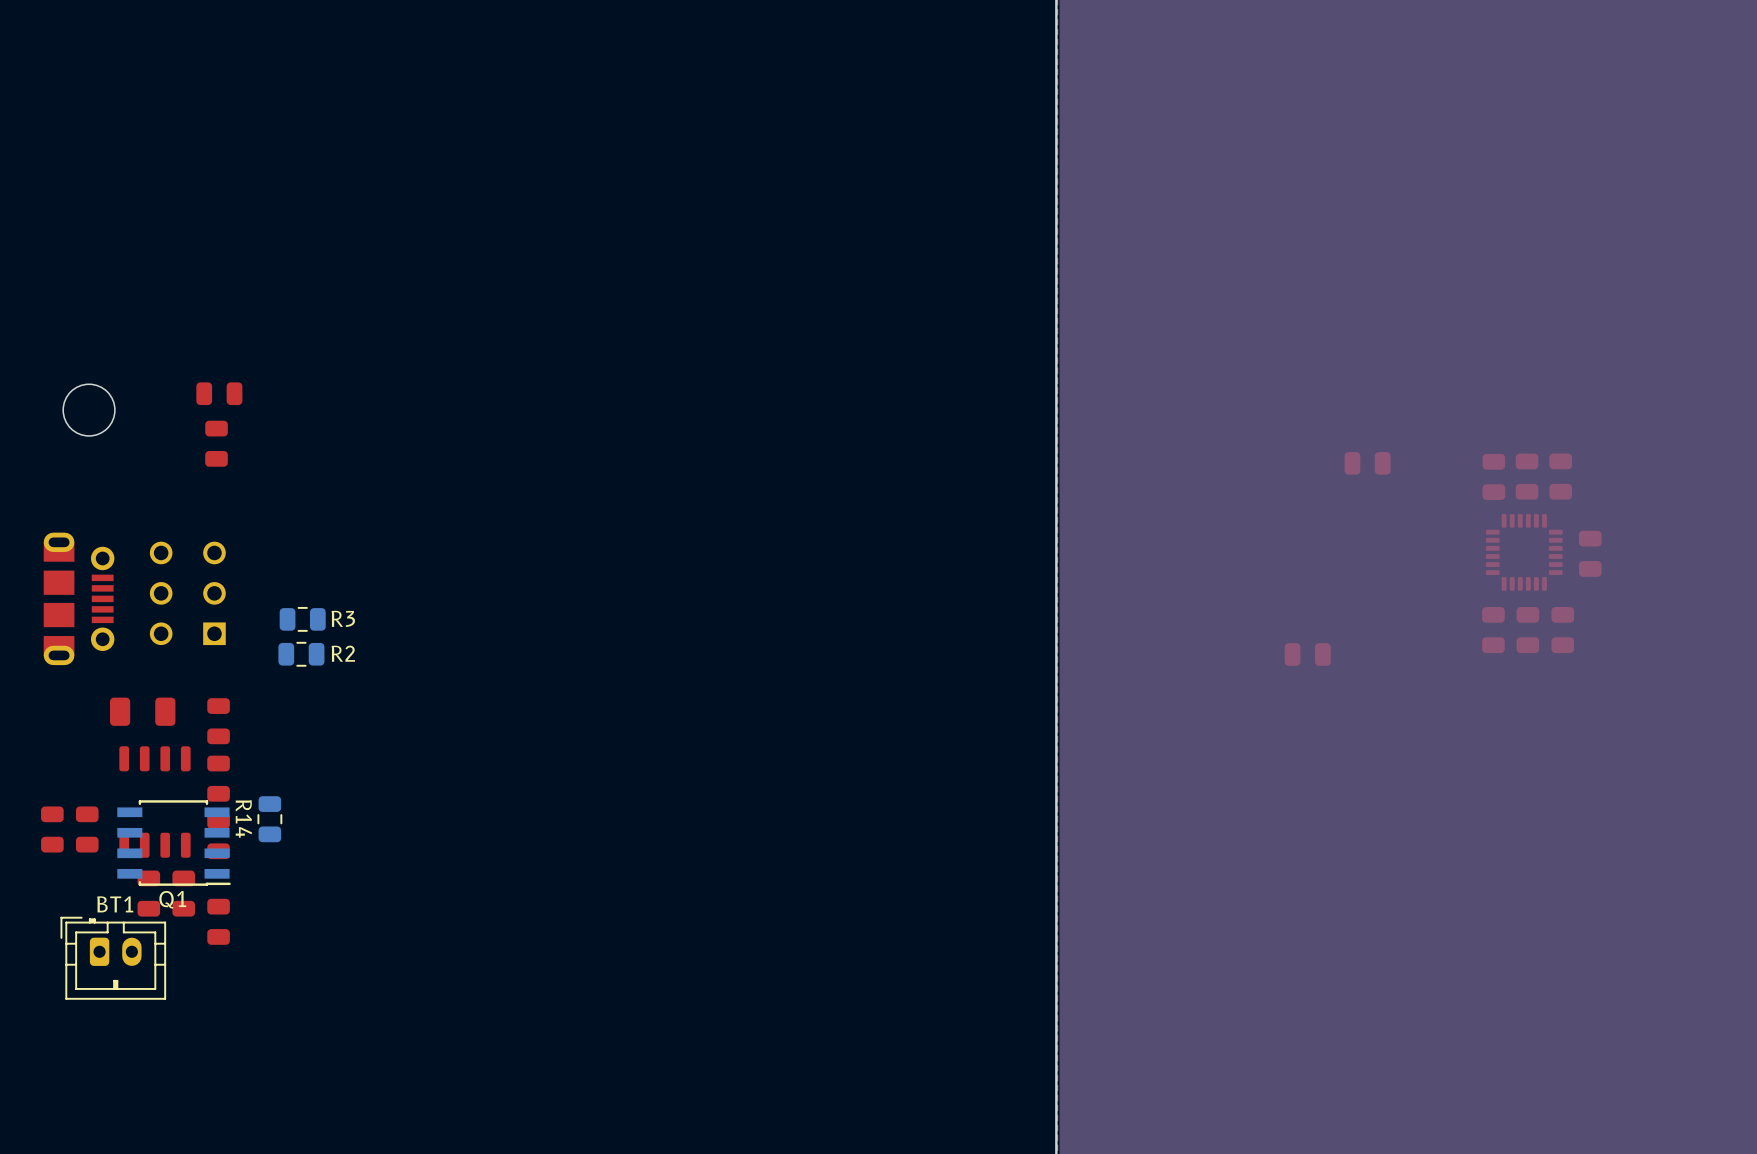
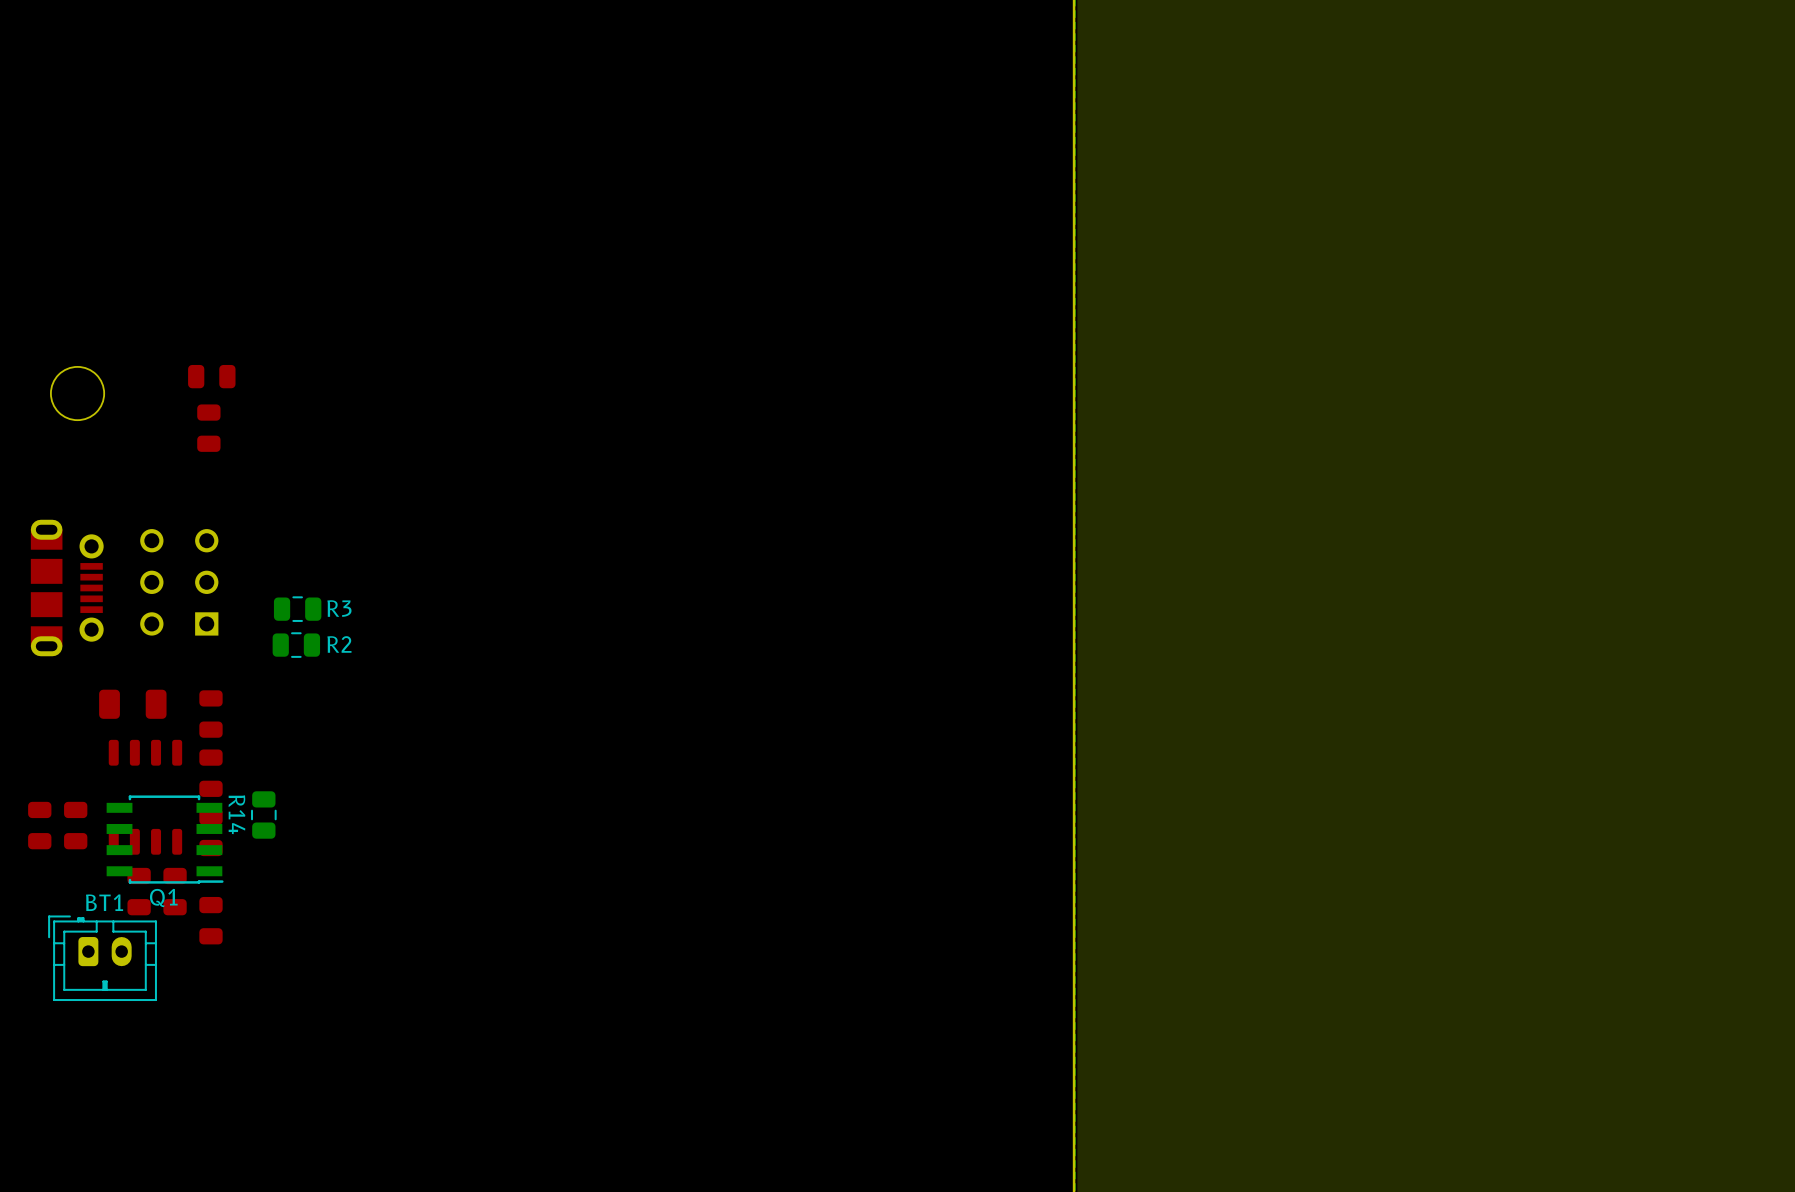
part: (1367, 463) -> none
part: (1493, 476) -> none
part: (1527, 476) -> none
part: (1560, 476) -> none
part: (1524, 552) -> none
part: (1590, 553) -> none
part: (1493, 630) -> none
part: (1527, 630) -> none
part: (1562, 630) -> none
part: (1307, 654) -> none

